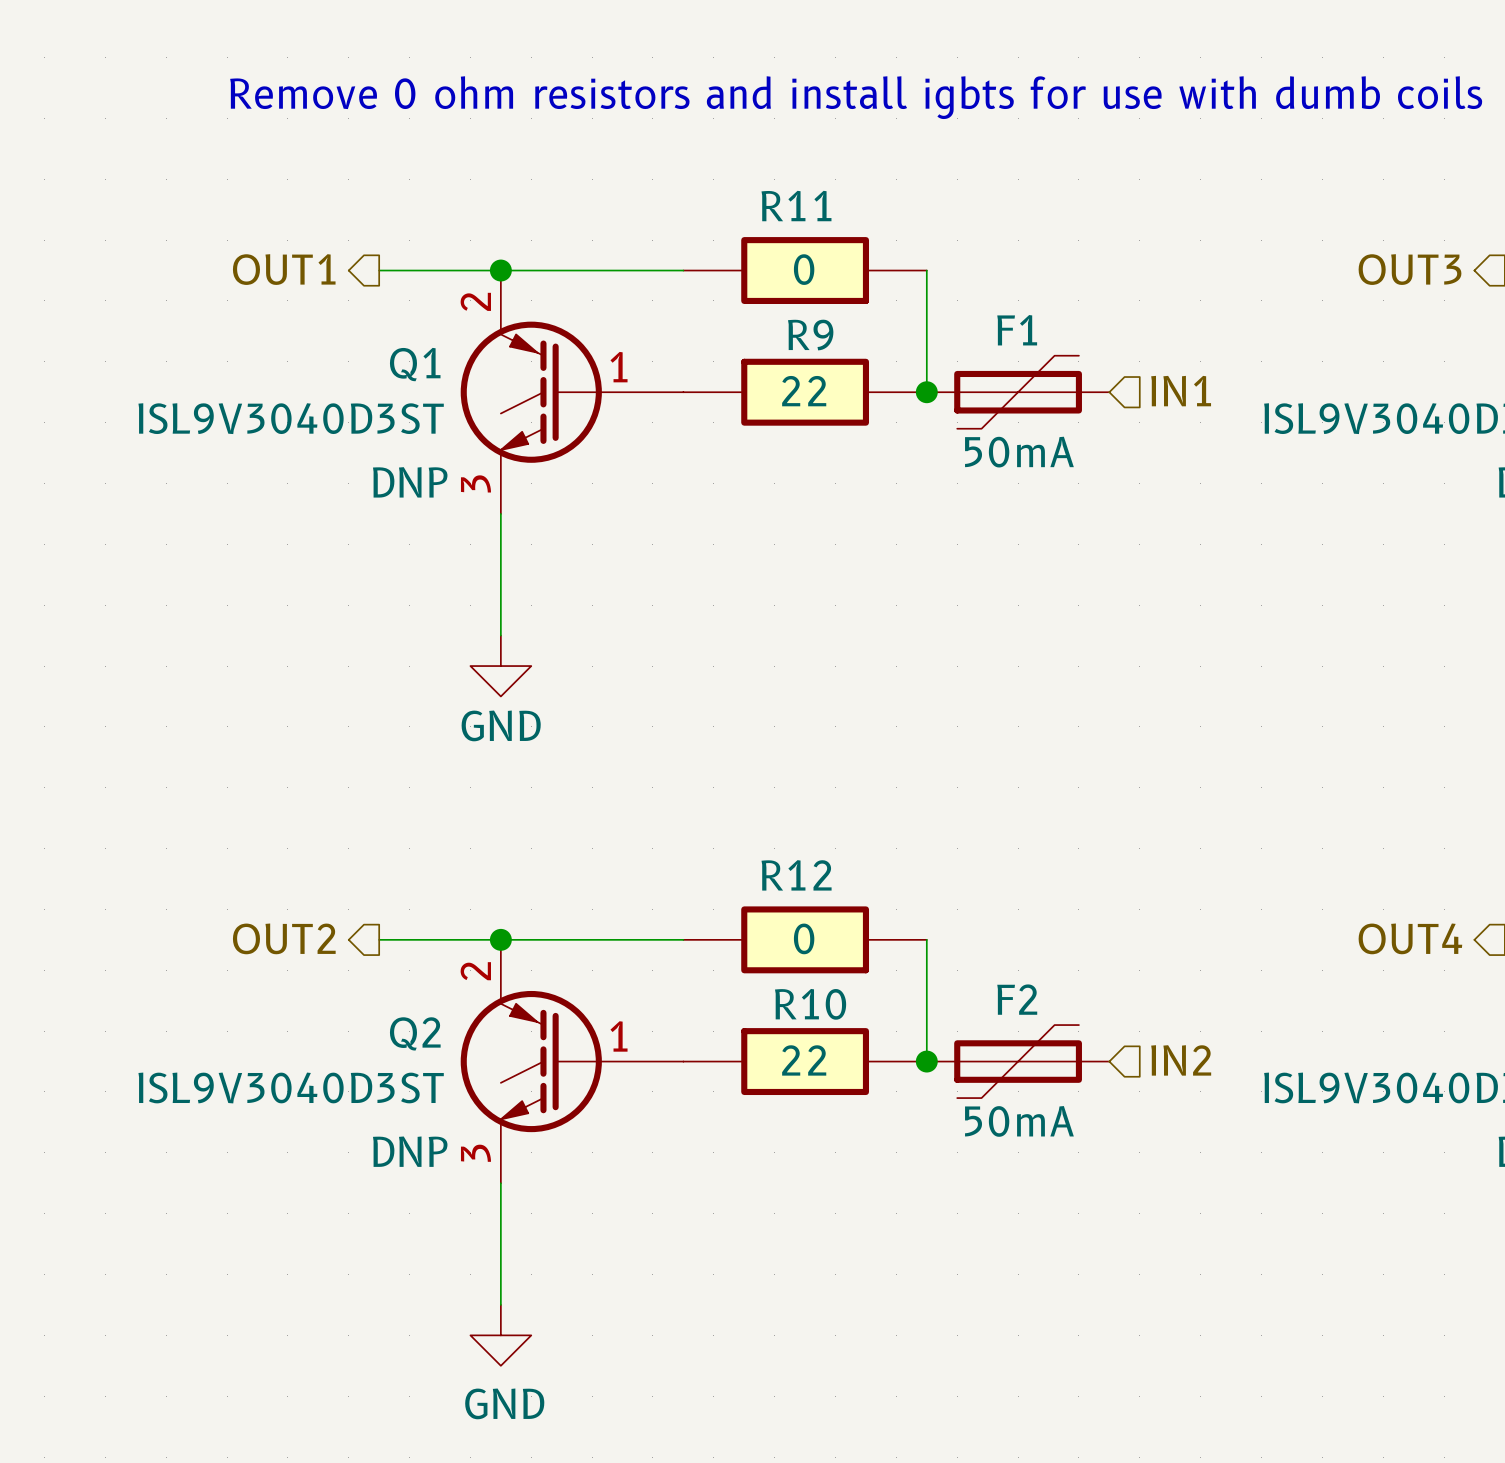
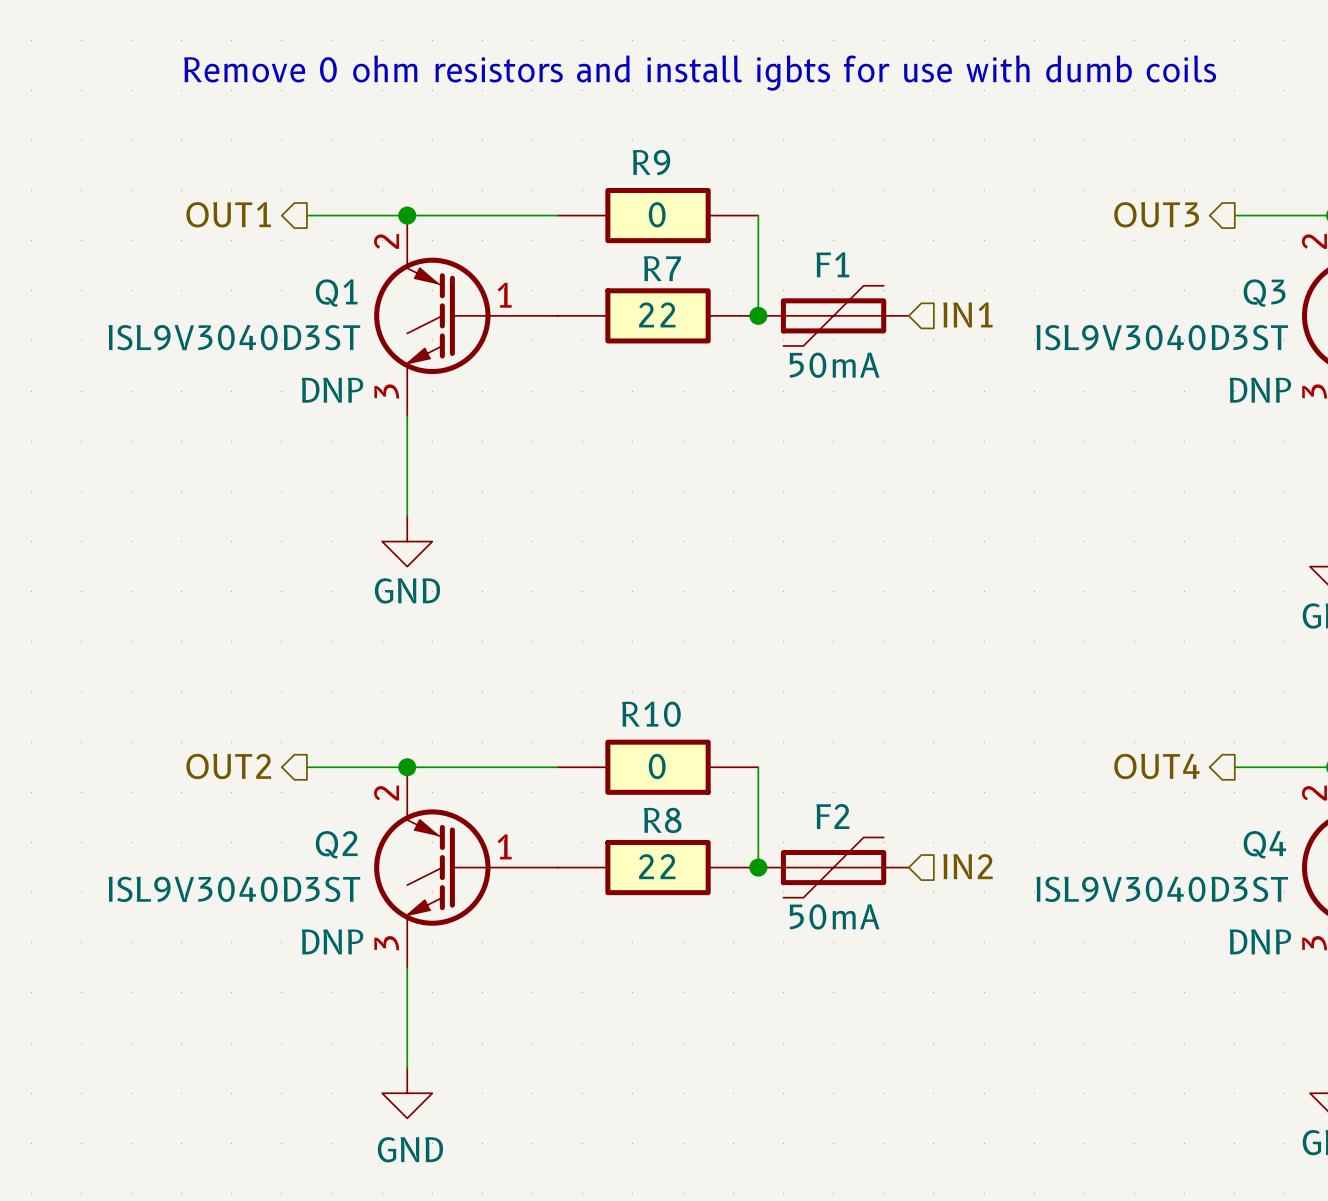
R11 name: R11 (796, 206) -> R9 (651, 162)
R9 name: R9 (810, 335) -> R7 (662, 268)
R12 name: R12 (796, 875) -> R10 (651, 714)
R10 name: R10 (810, 1004) -> R8 (662, 820)

